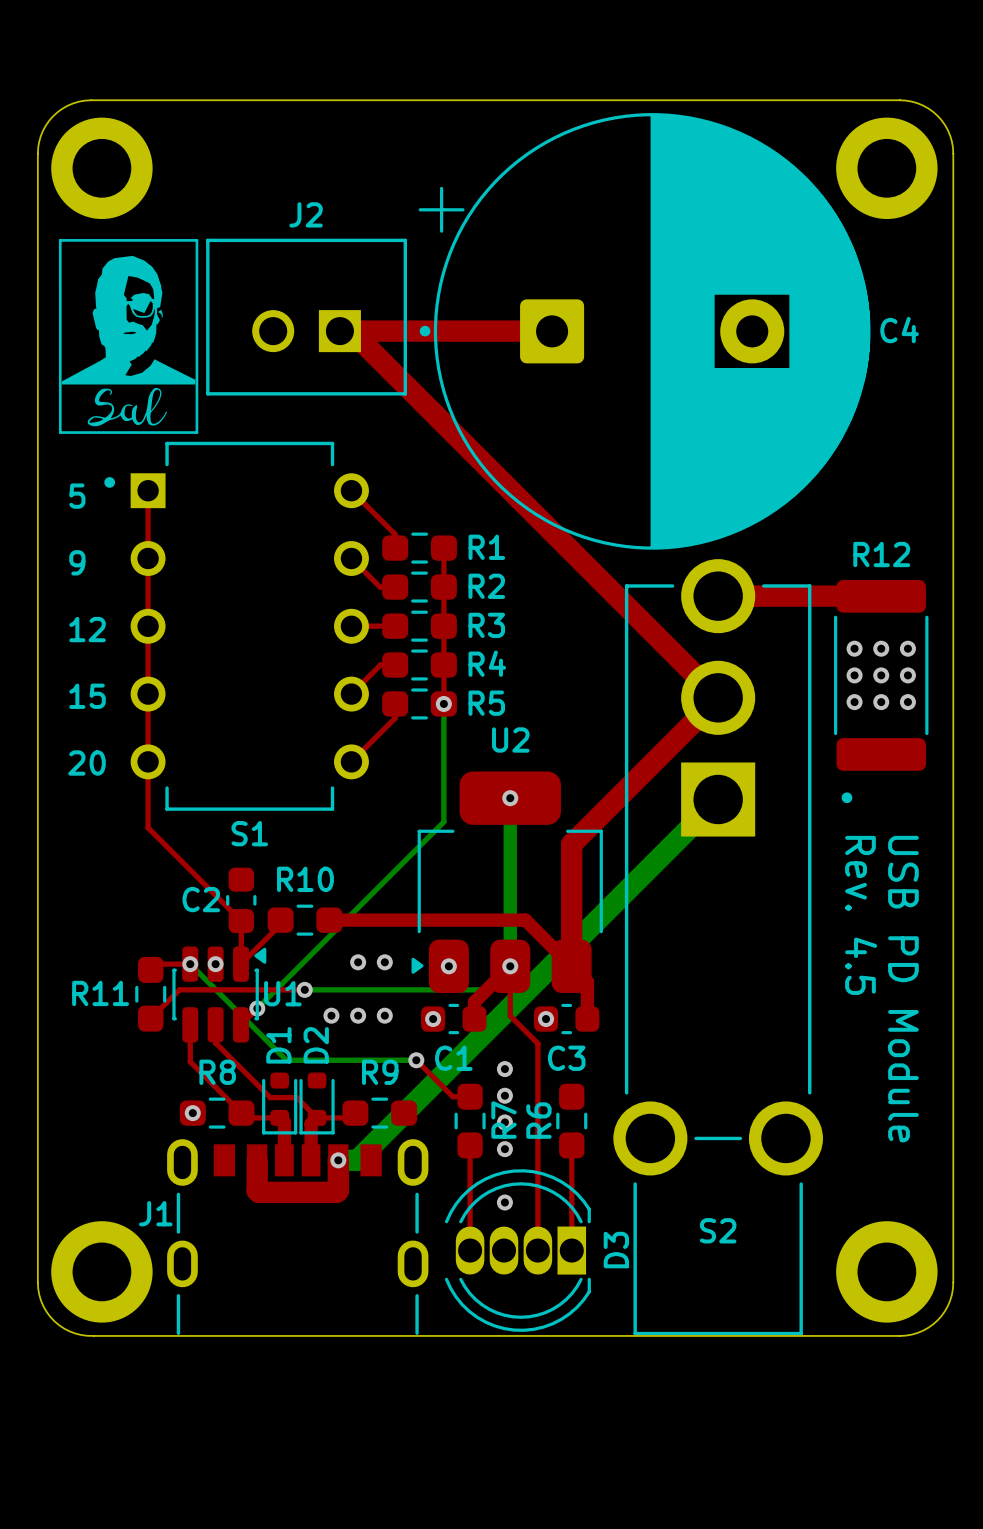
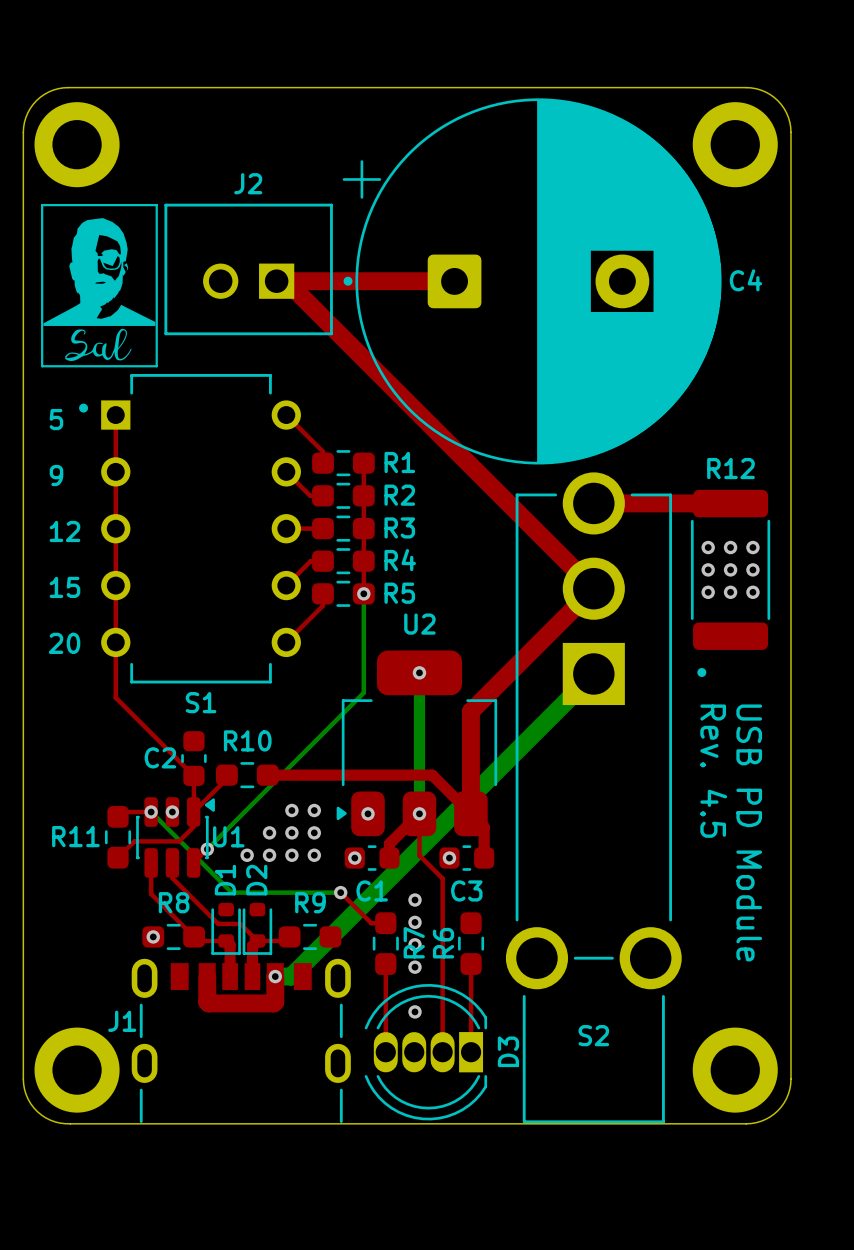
bottom track: (510, 966) (486, 989) (304, 989) -> none
top track: (304, 989) (179, 989) (170, 999) -> (193, 812) (193, 826) (179, 841) (134, 841)
via: (304, 989) -> none
via: none -> (269, 832)
via: none -> (291, 832)
via: none -> (314, 832)
via: none -> (247, 855)

